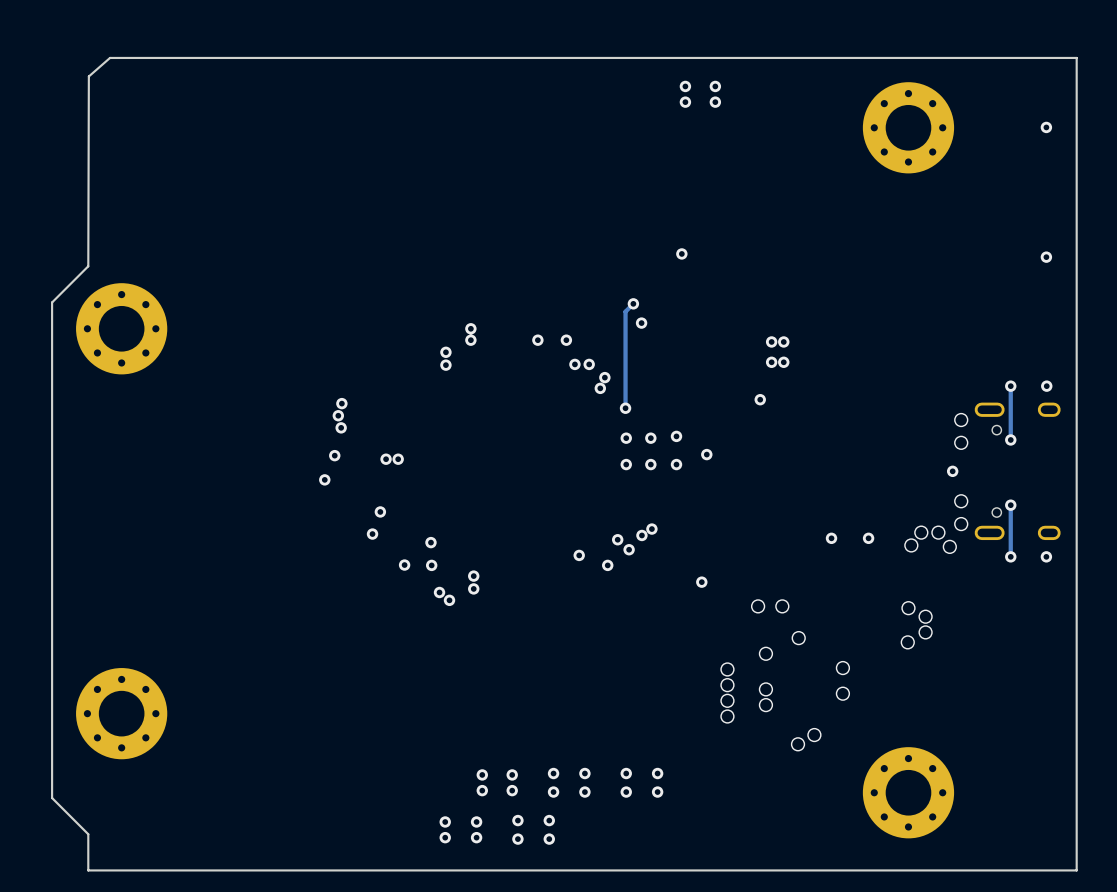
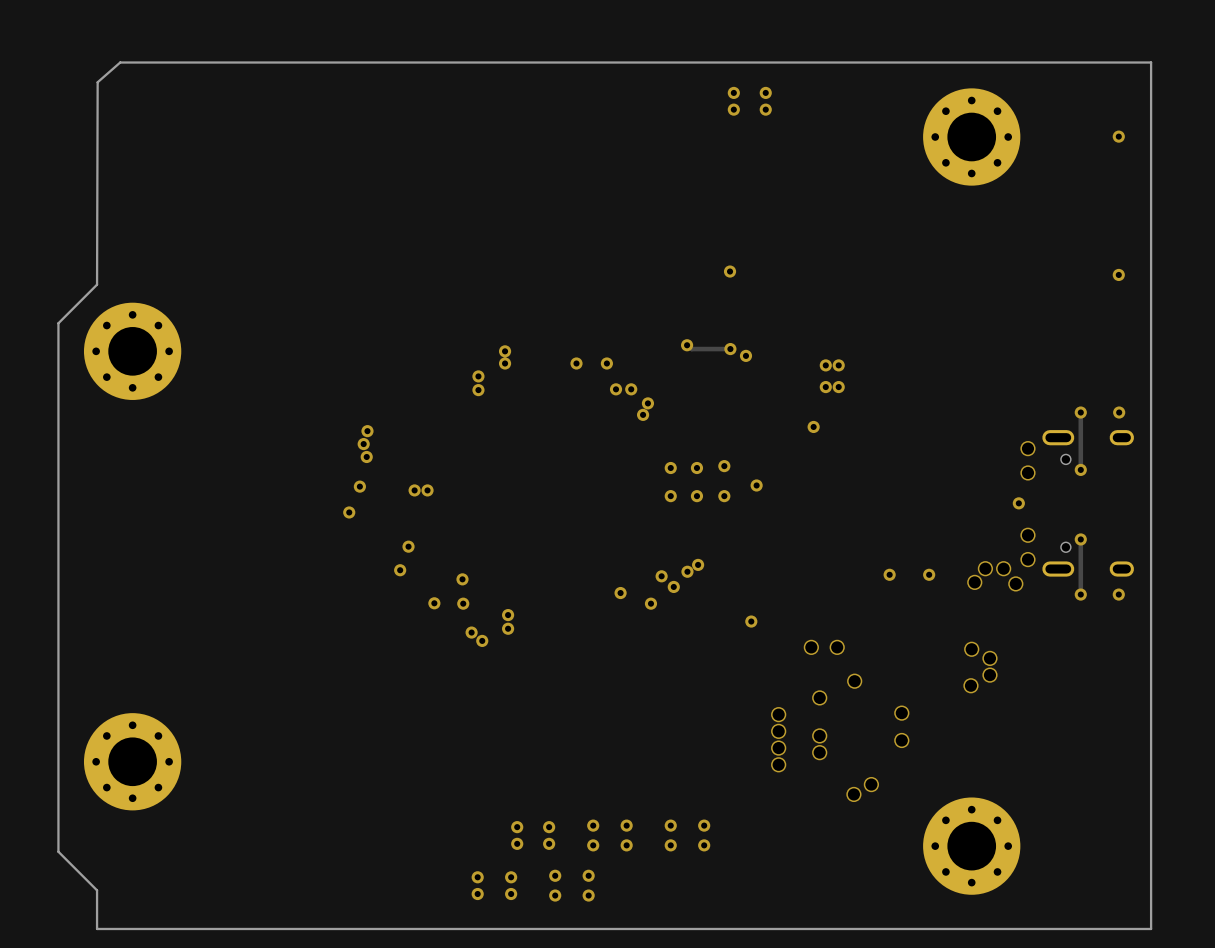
track: (633, 303) (625, 311) (625, 408) -> none
via: (633, 303) -> none
track: none -> (691, 348) (730, 349)
via: none -> (730, 349)
via: none -> (745, 355)
via: (625, 408) -> none

